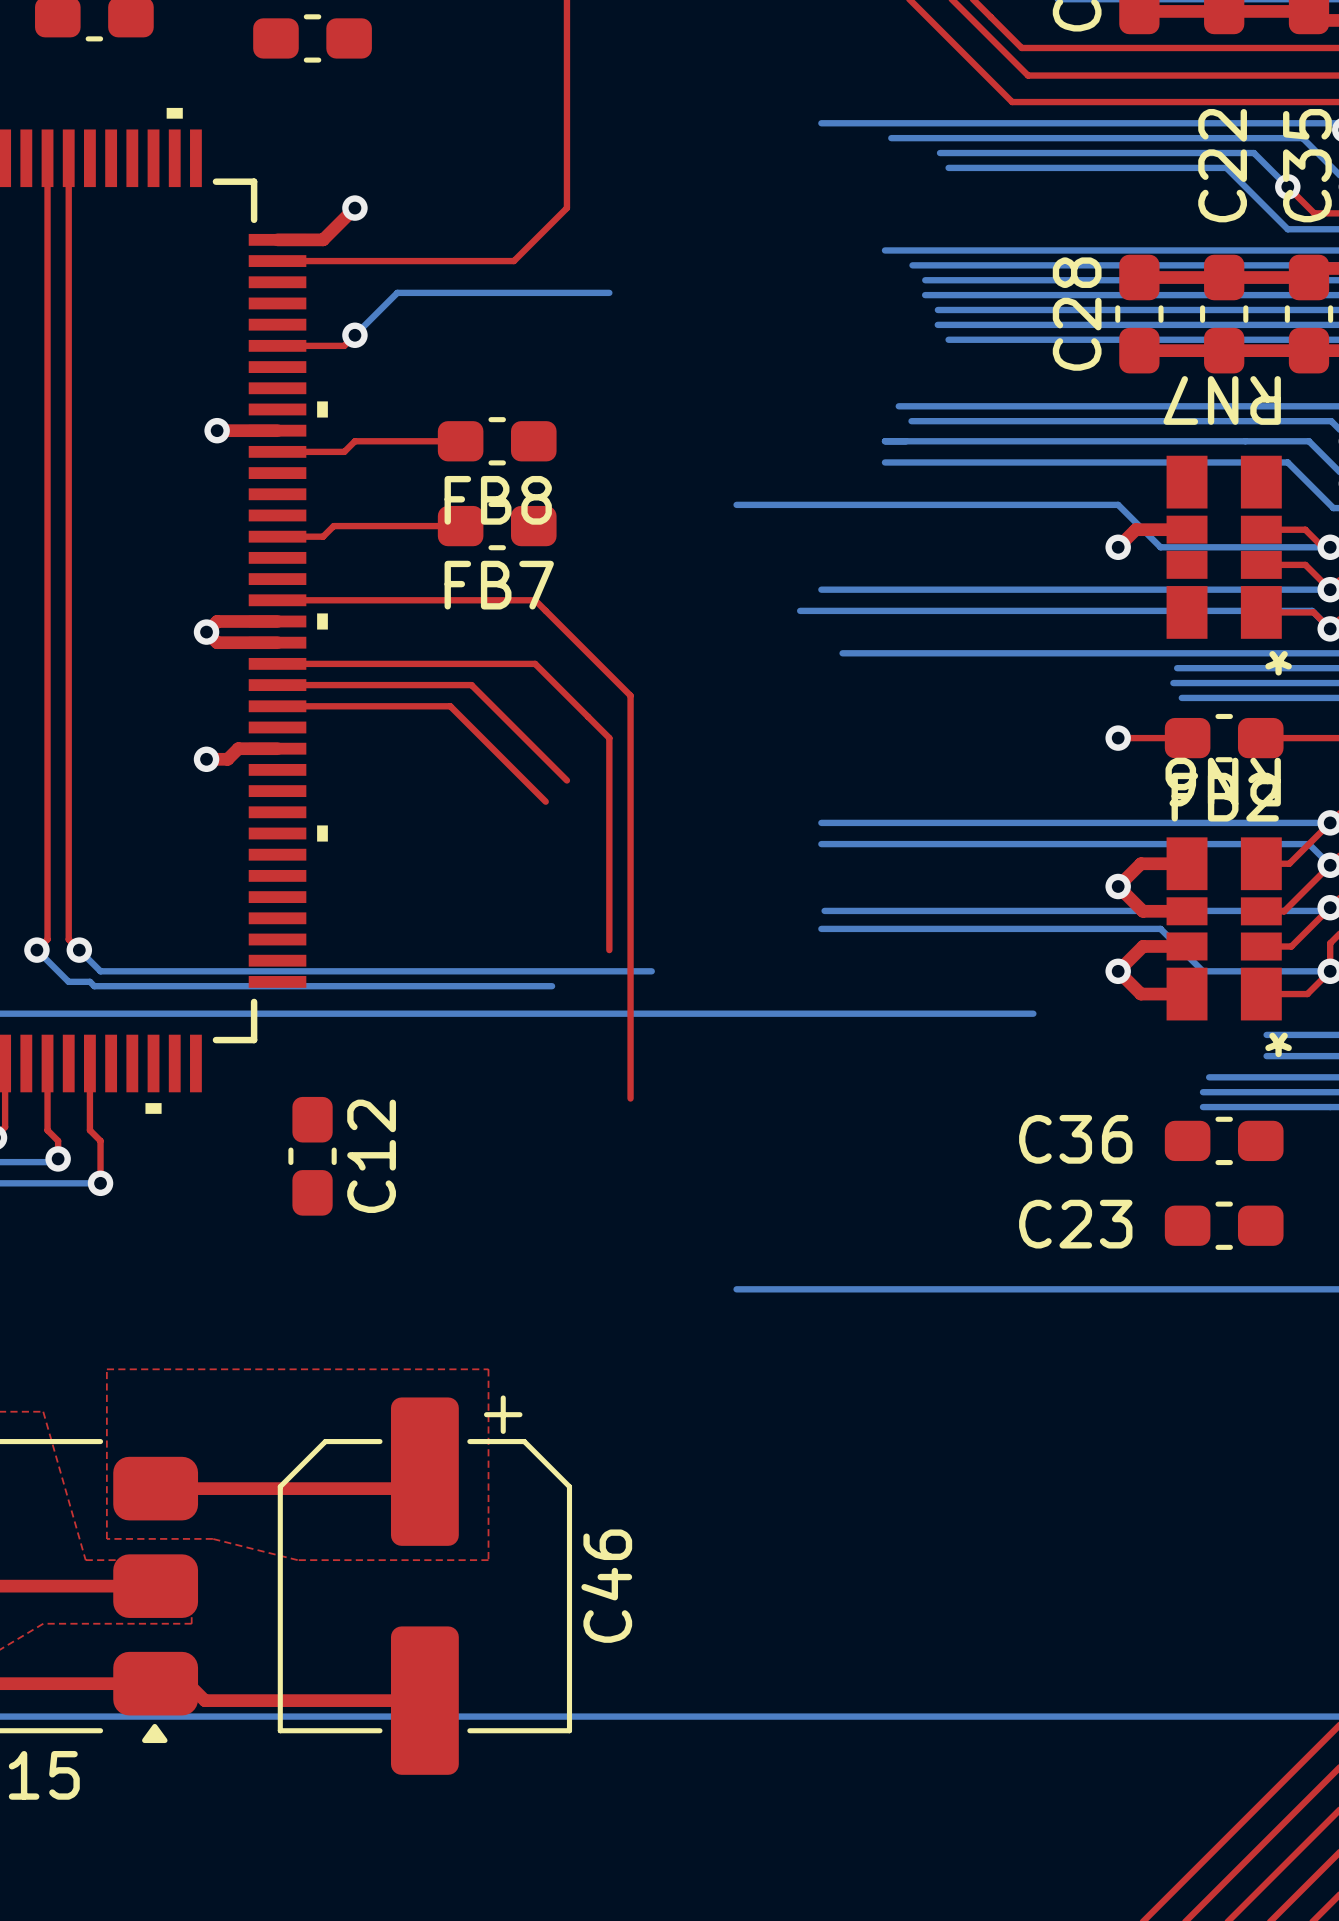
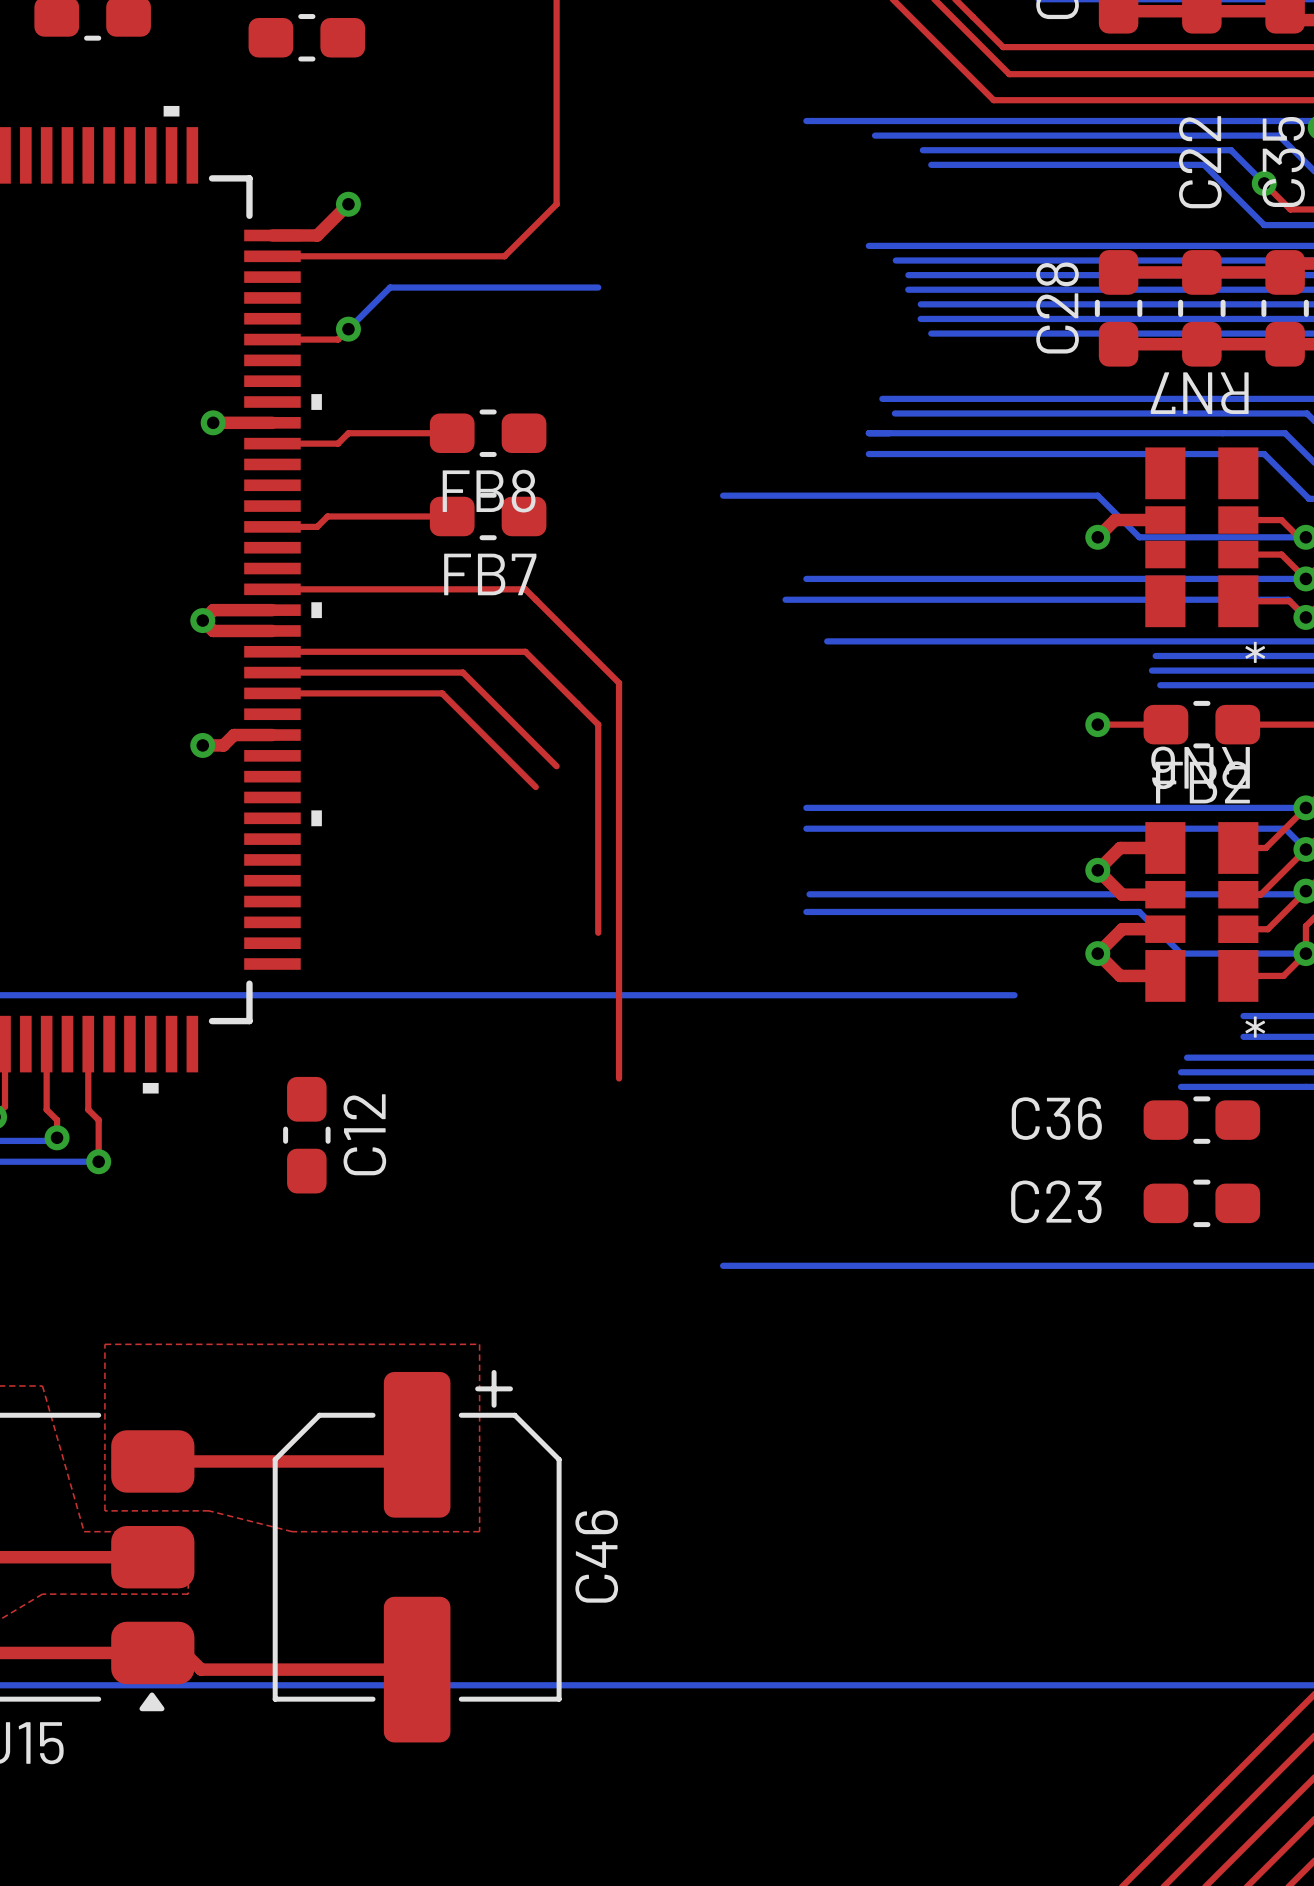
top track: (47, 158) (47, 939) (36, 950) -> none
top track: (68, 158) (68, 939) (79, 950) -> none
bottom track: (36, 950) (68, 981) (90, 981) (94, 986) (552, 986) -> none
via: (36, 950) -> none
bottom track: (79, 950) (100, 971) (651, 971) -> none
via: (79, 950) -> none

